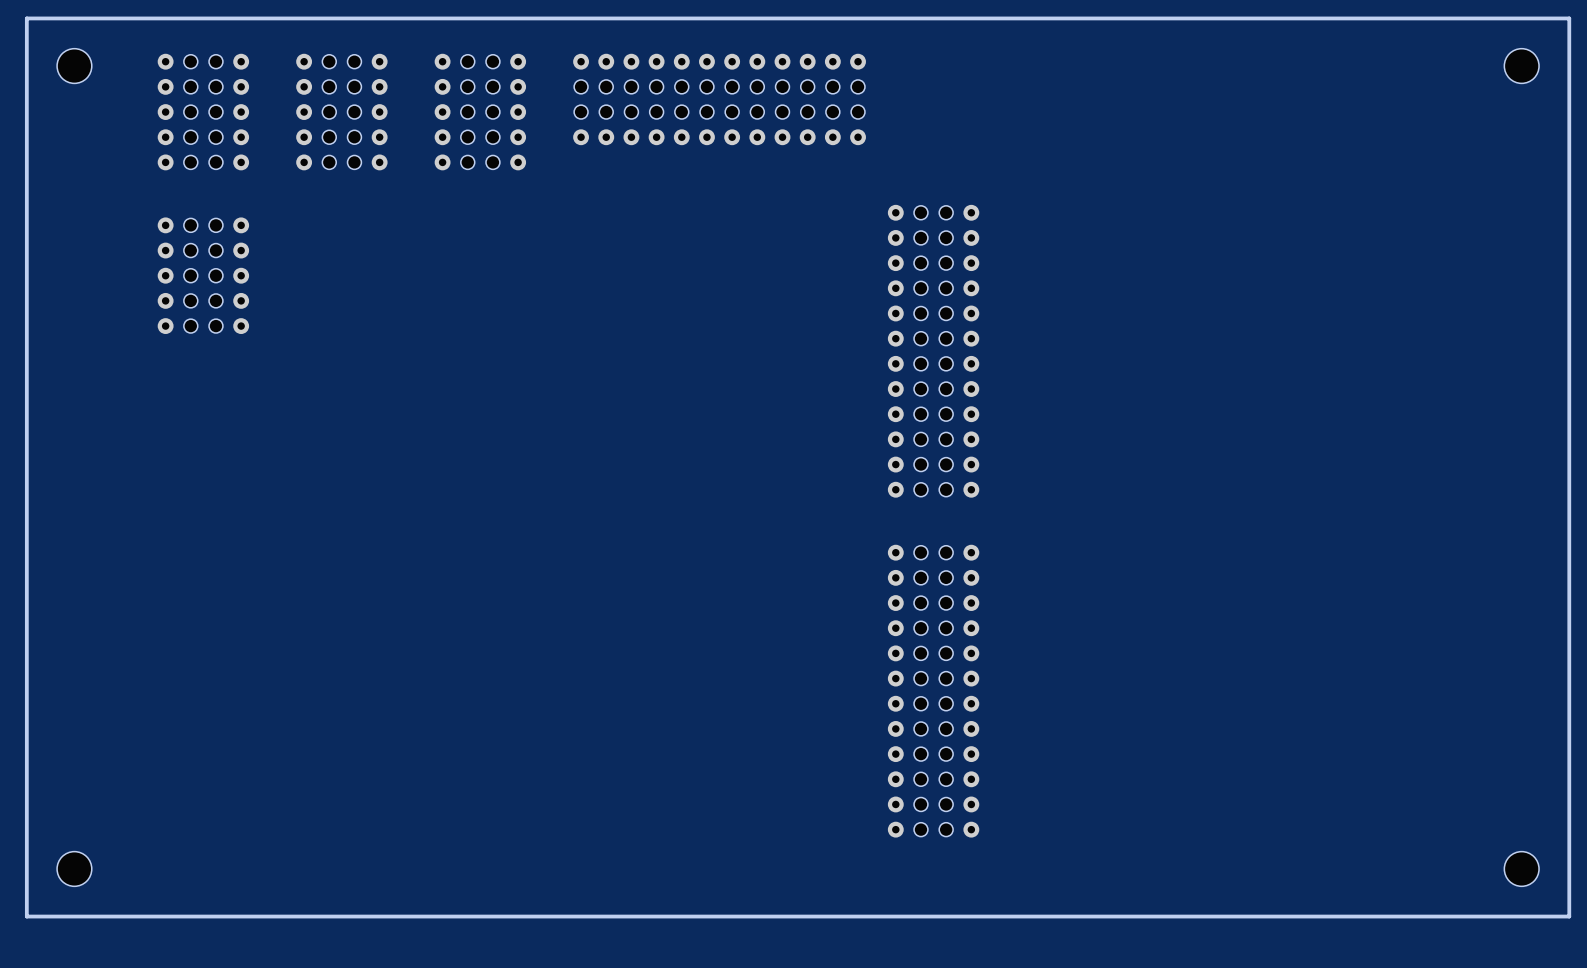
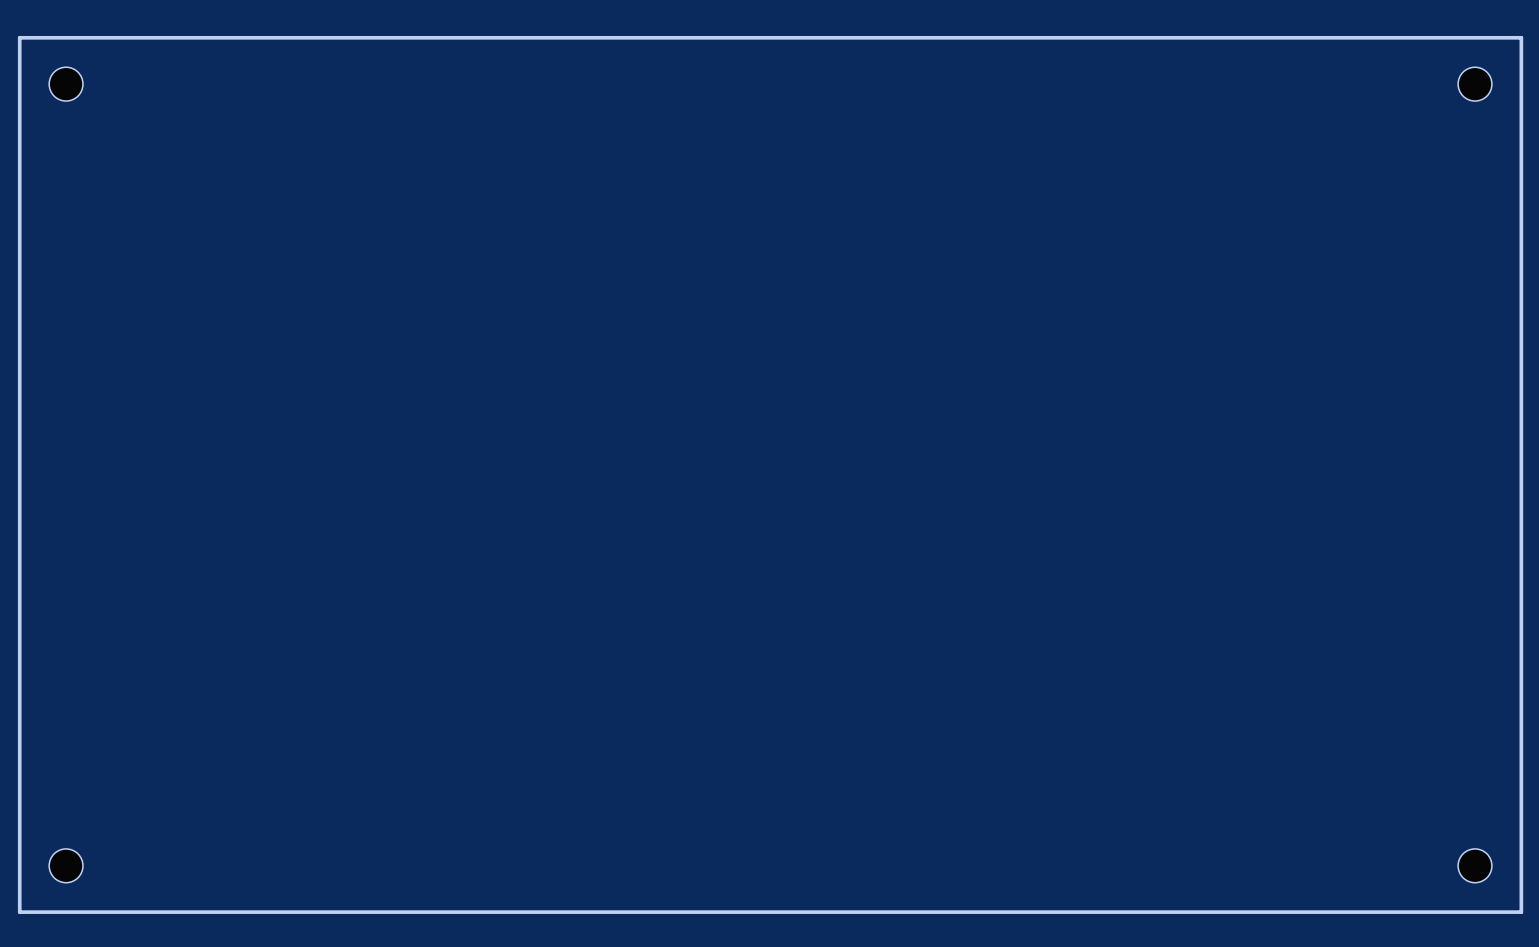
part: (719, 99) -> none
part: (203, 112) -> none
part: (341, 112) -> none
part: (480, 112) -> none
part: (203, 275) -> none
part: (933, 351) -> none
part: (933, 691) -> none

